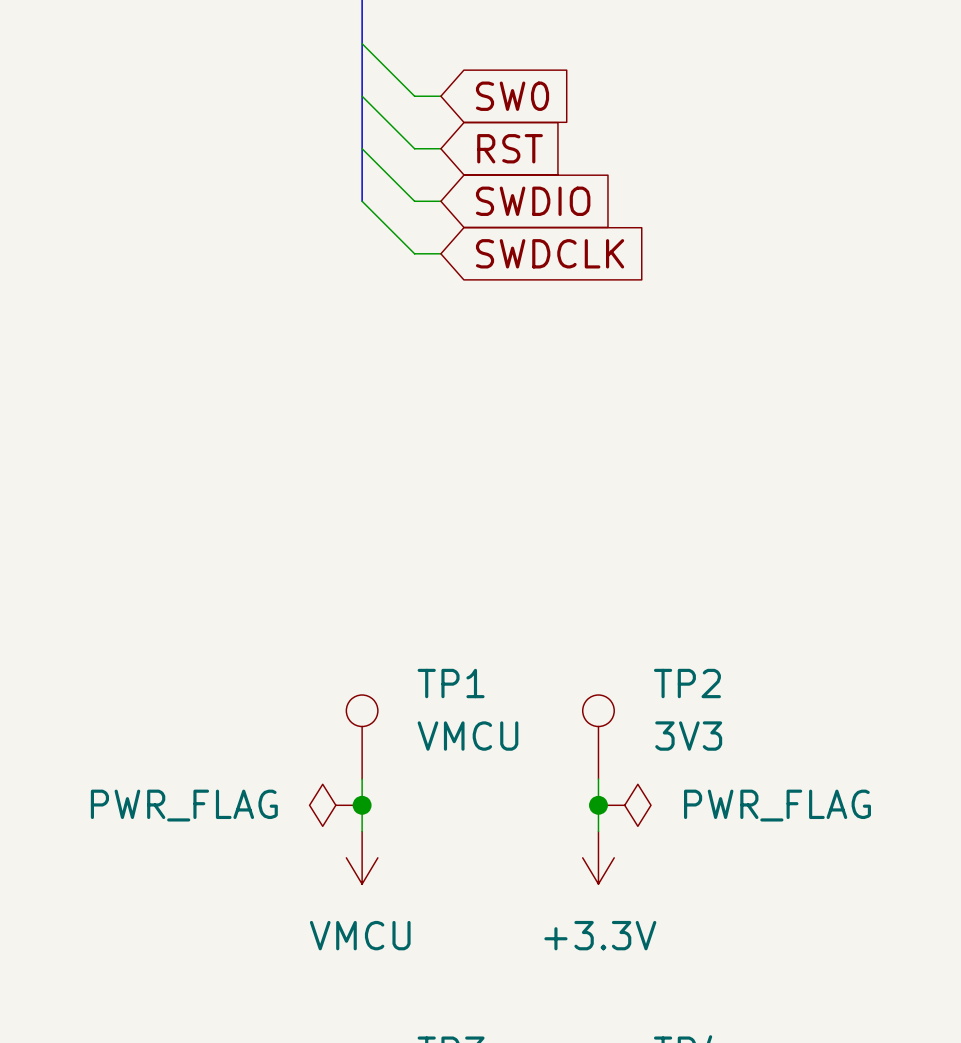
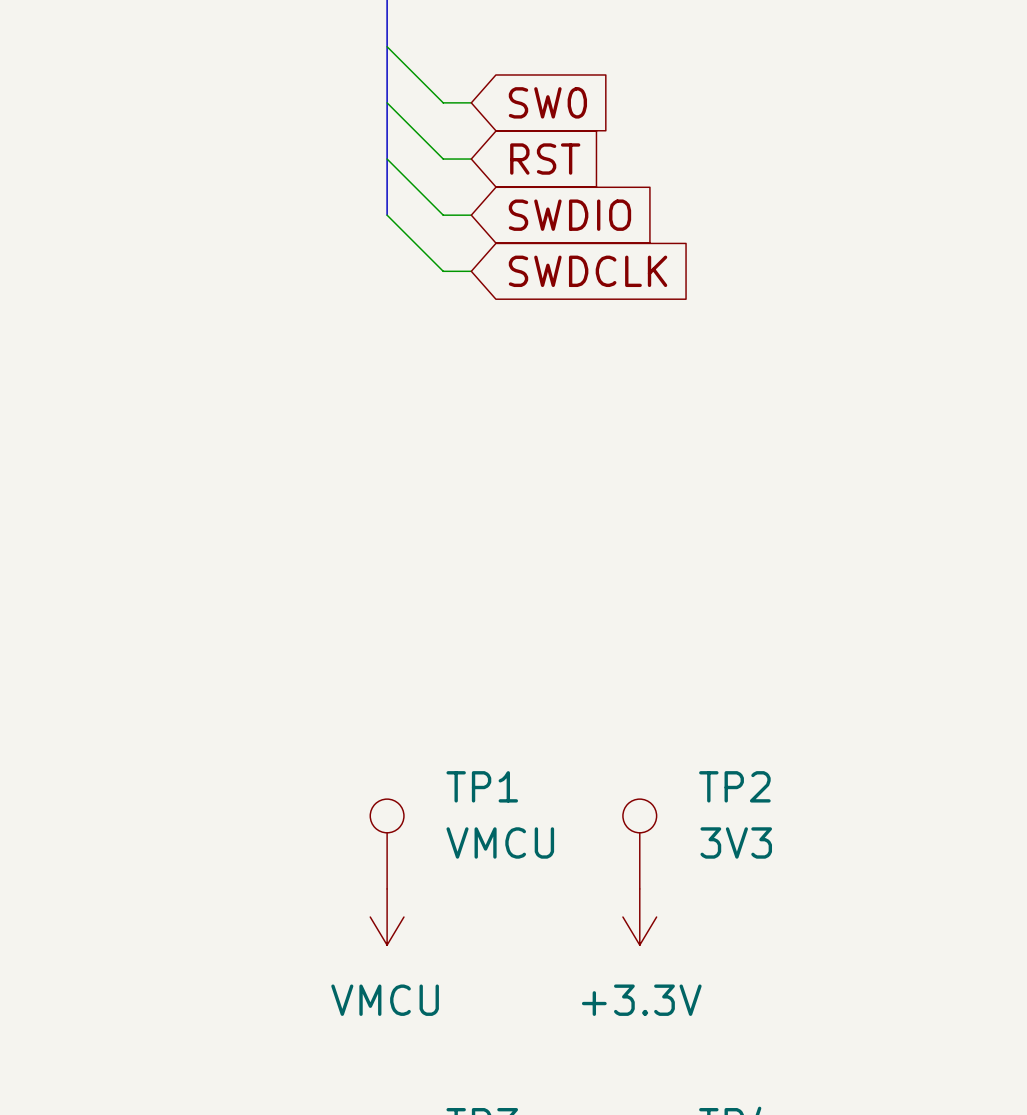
TP1 position: (362, 737) -> (387, 844)
TP2 position: (598, 737) -> (639, 844)
power symbol: PWR_FLAG (335, 805) -> none
junction: (362, 805) -> none
junction: (598, 805) -> none
power symbol: PWR_FLAG (624, 805) -> none

